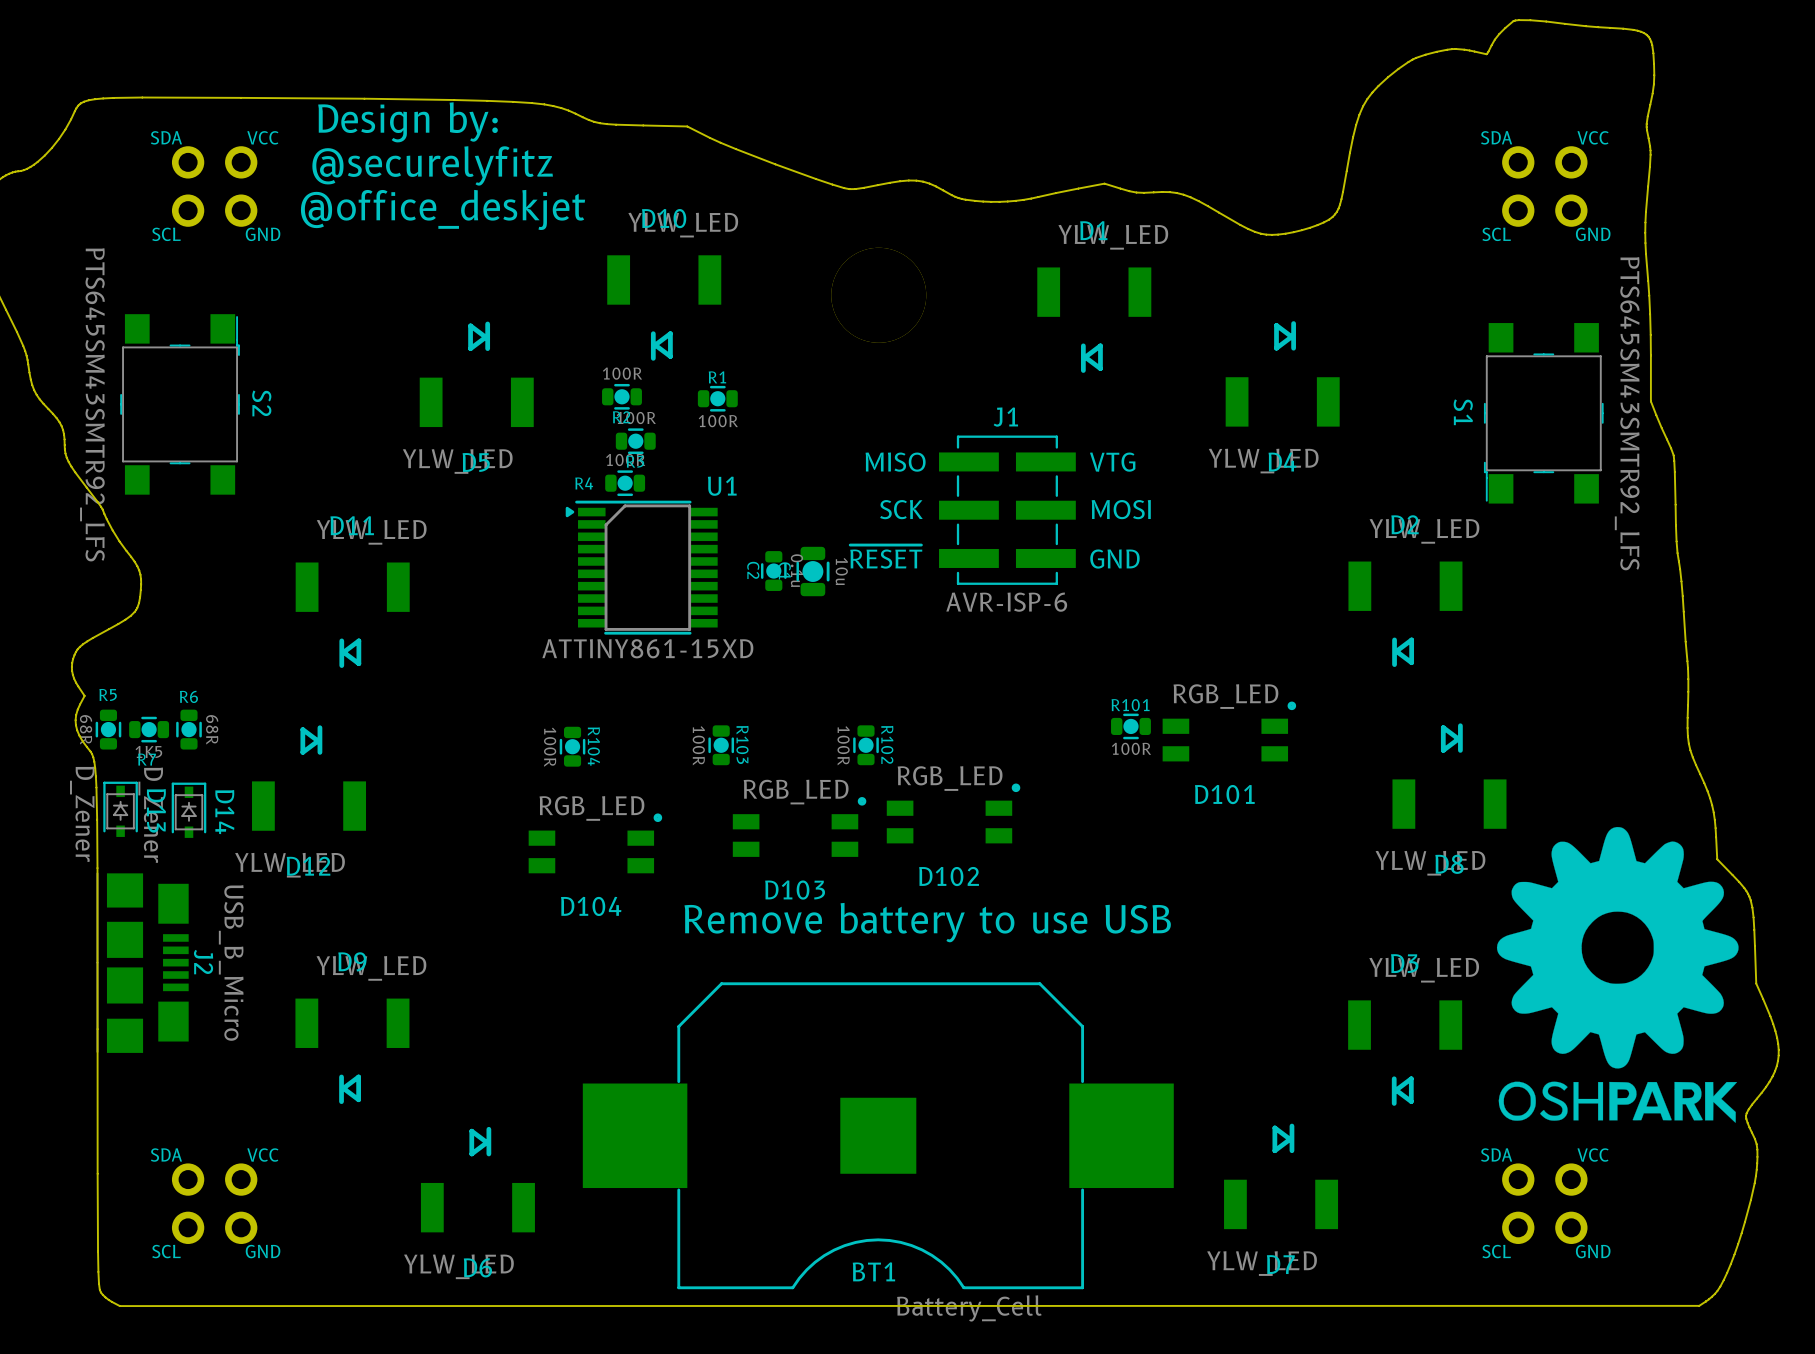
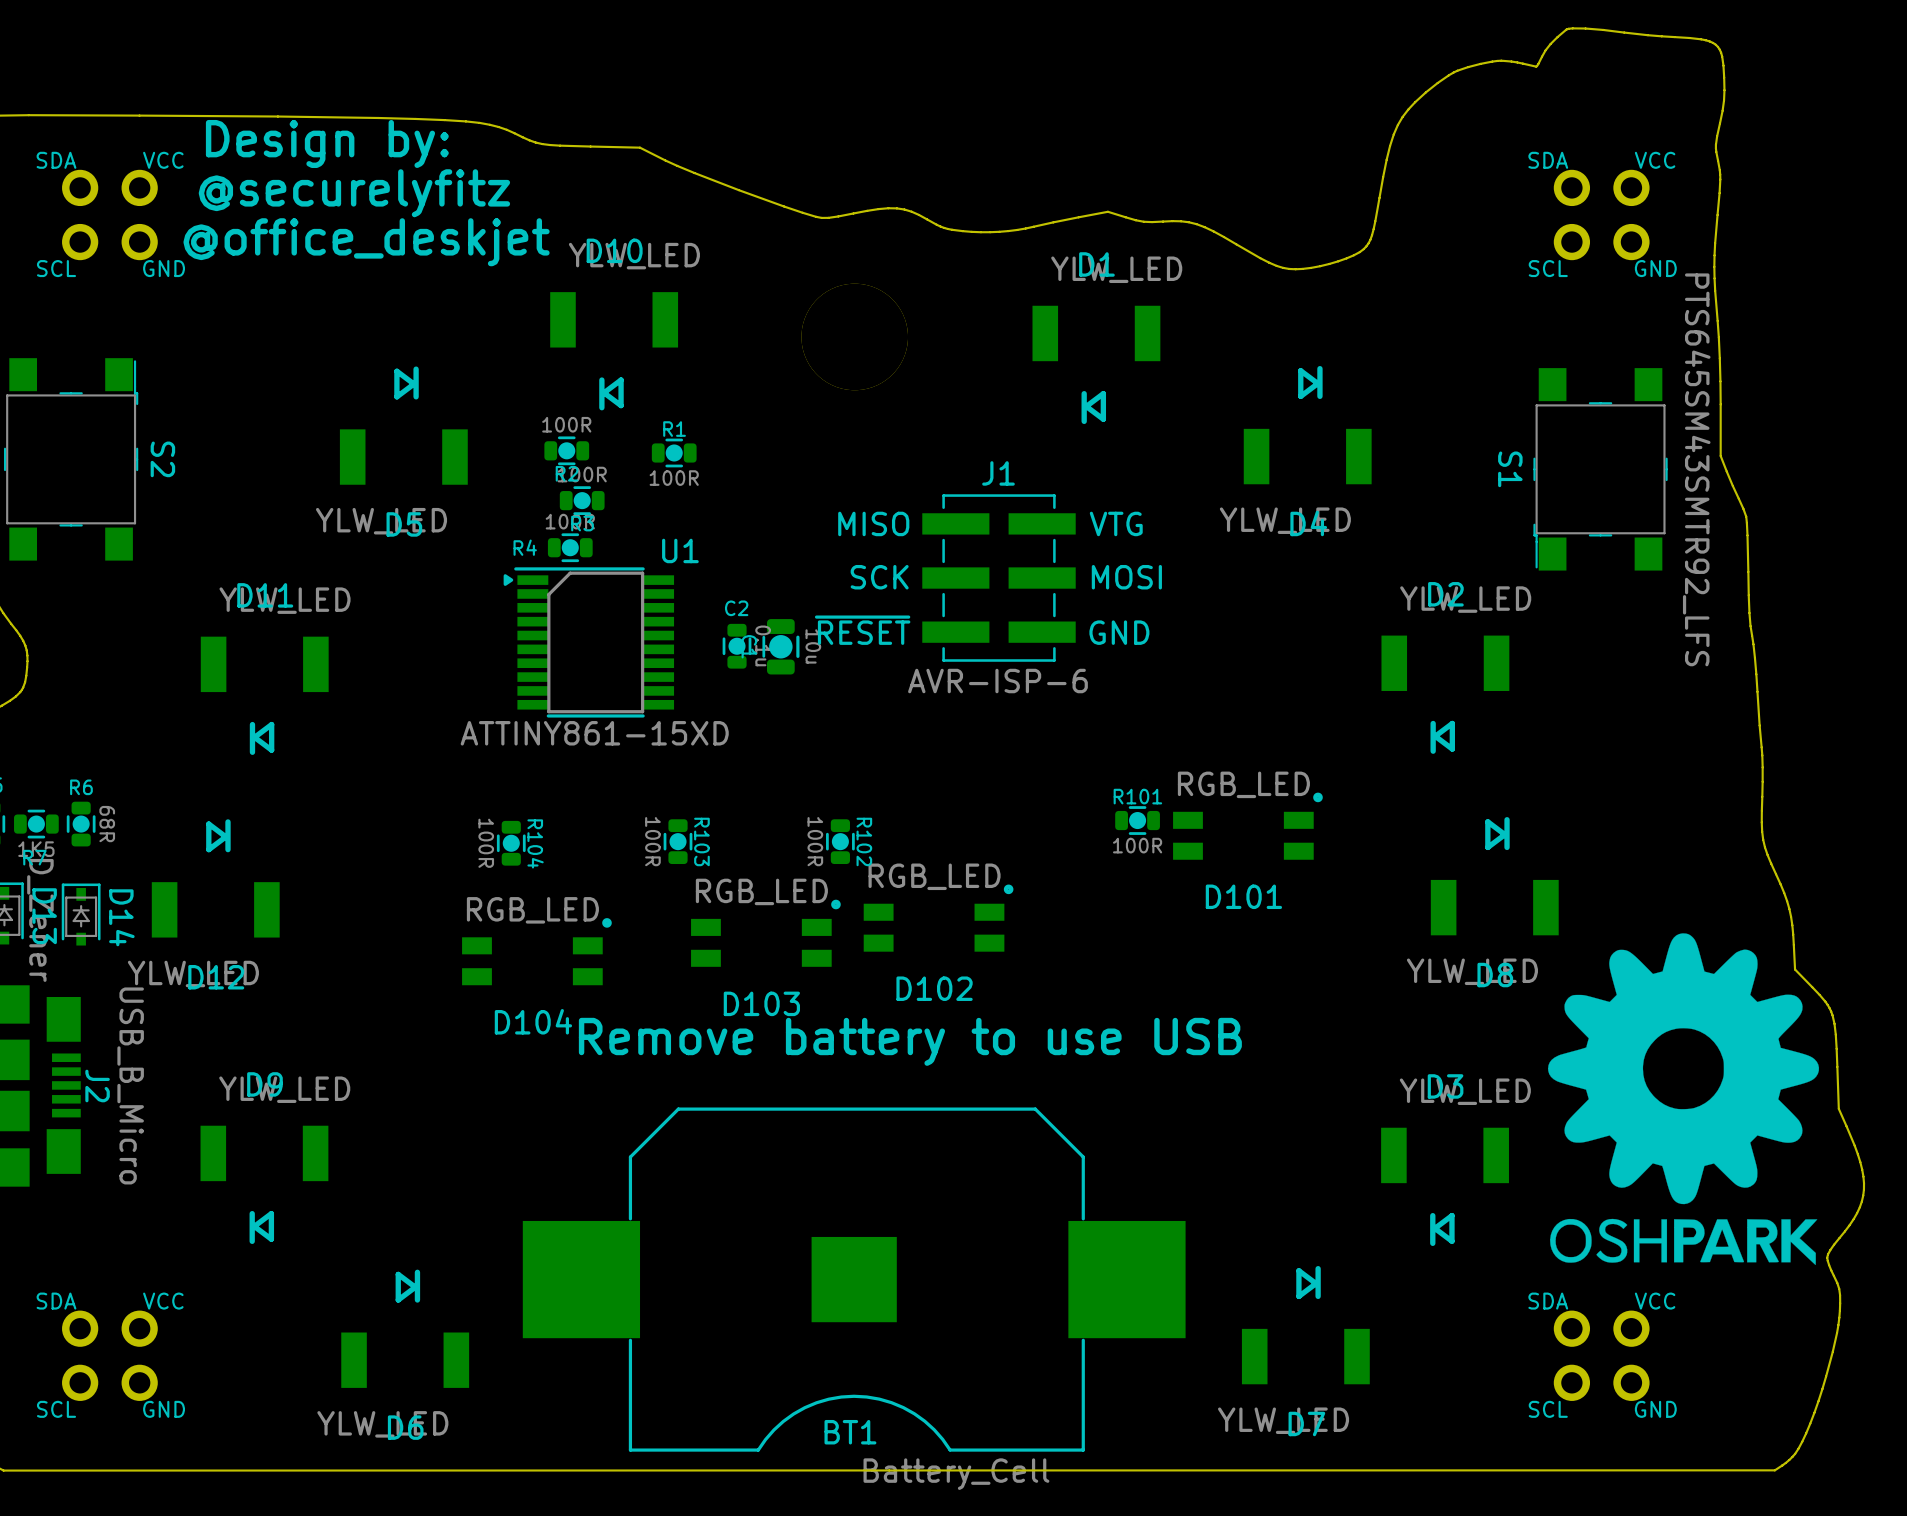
C2 name rotation: 0° (753, 570) -> 90° counterclockwise (736, 608)
C2 name position: C2 (753, 570) -> C2 (736, 608)

